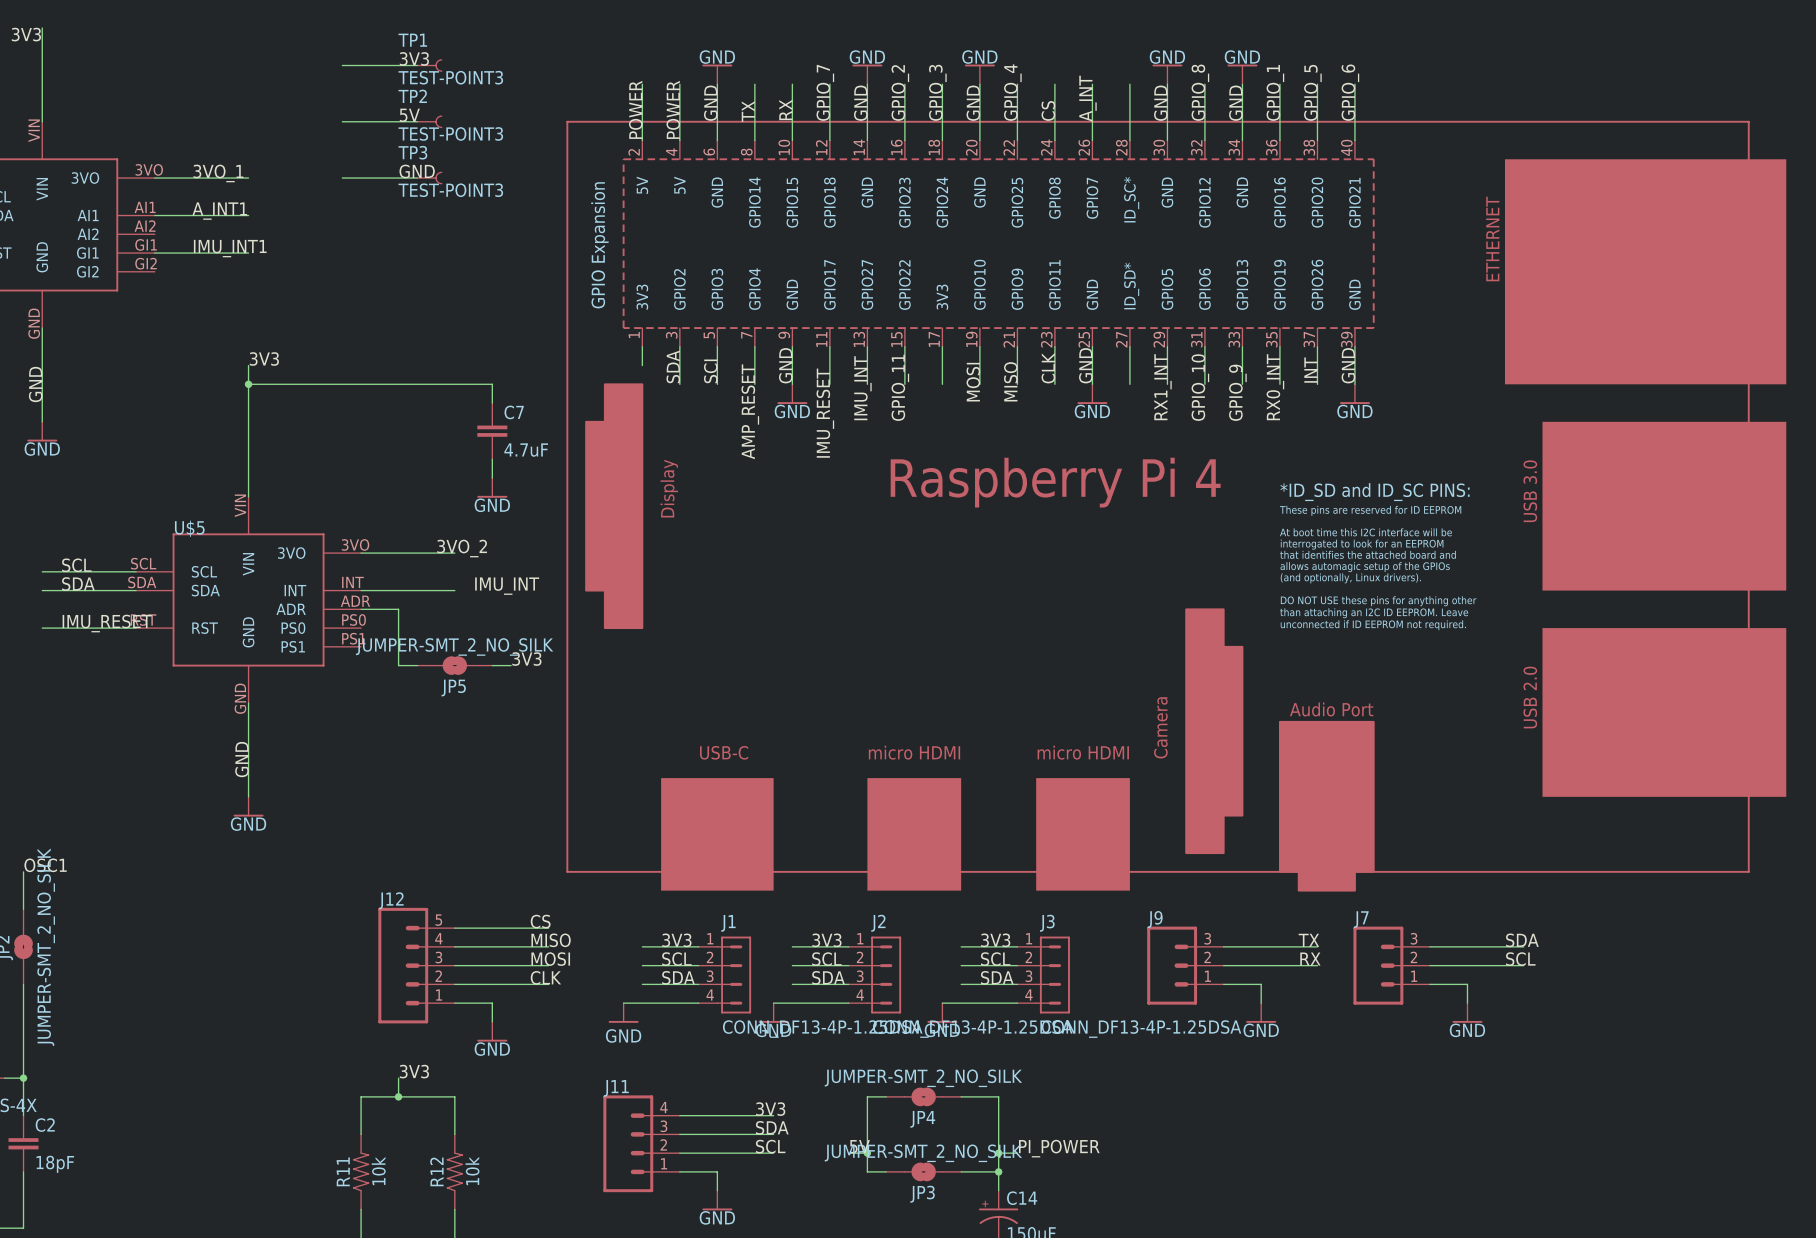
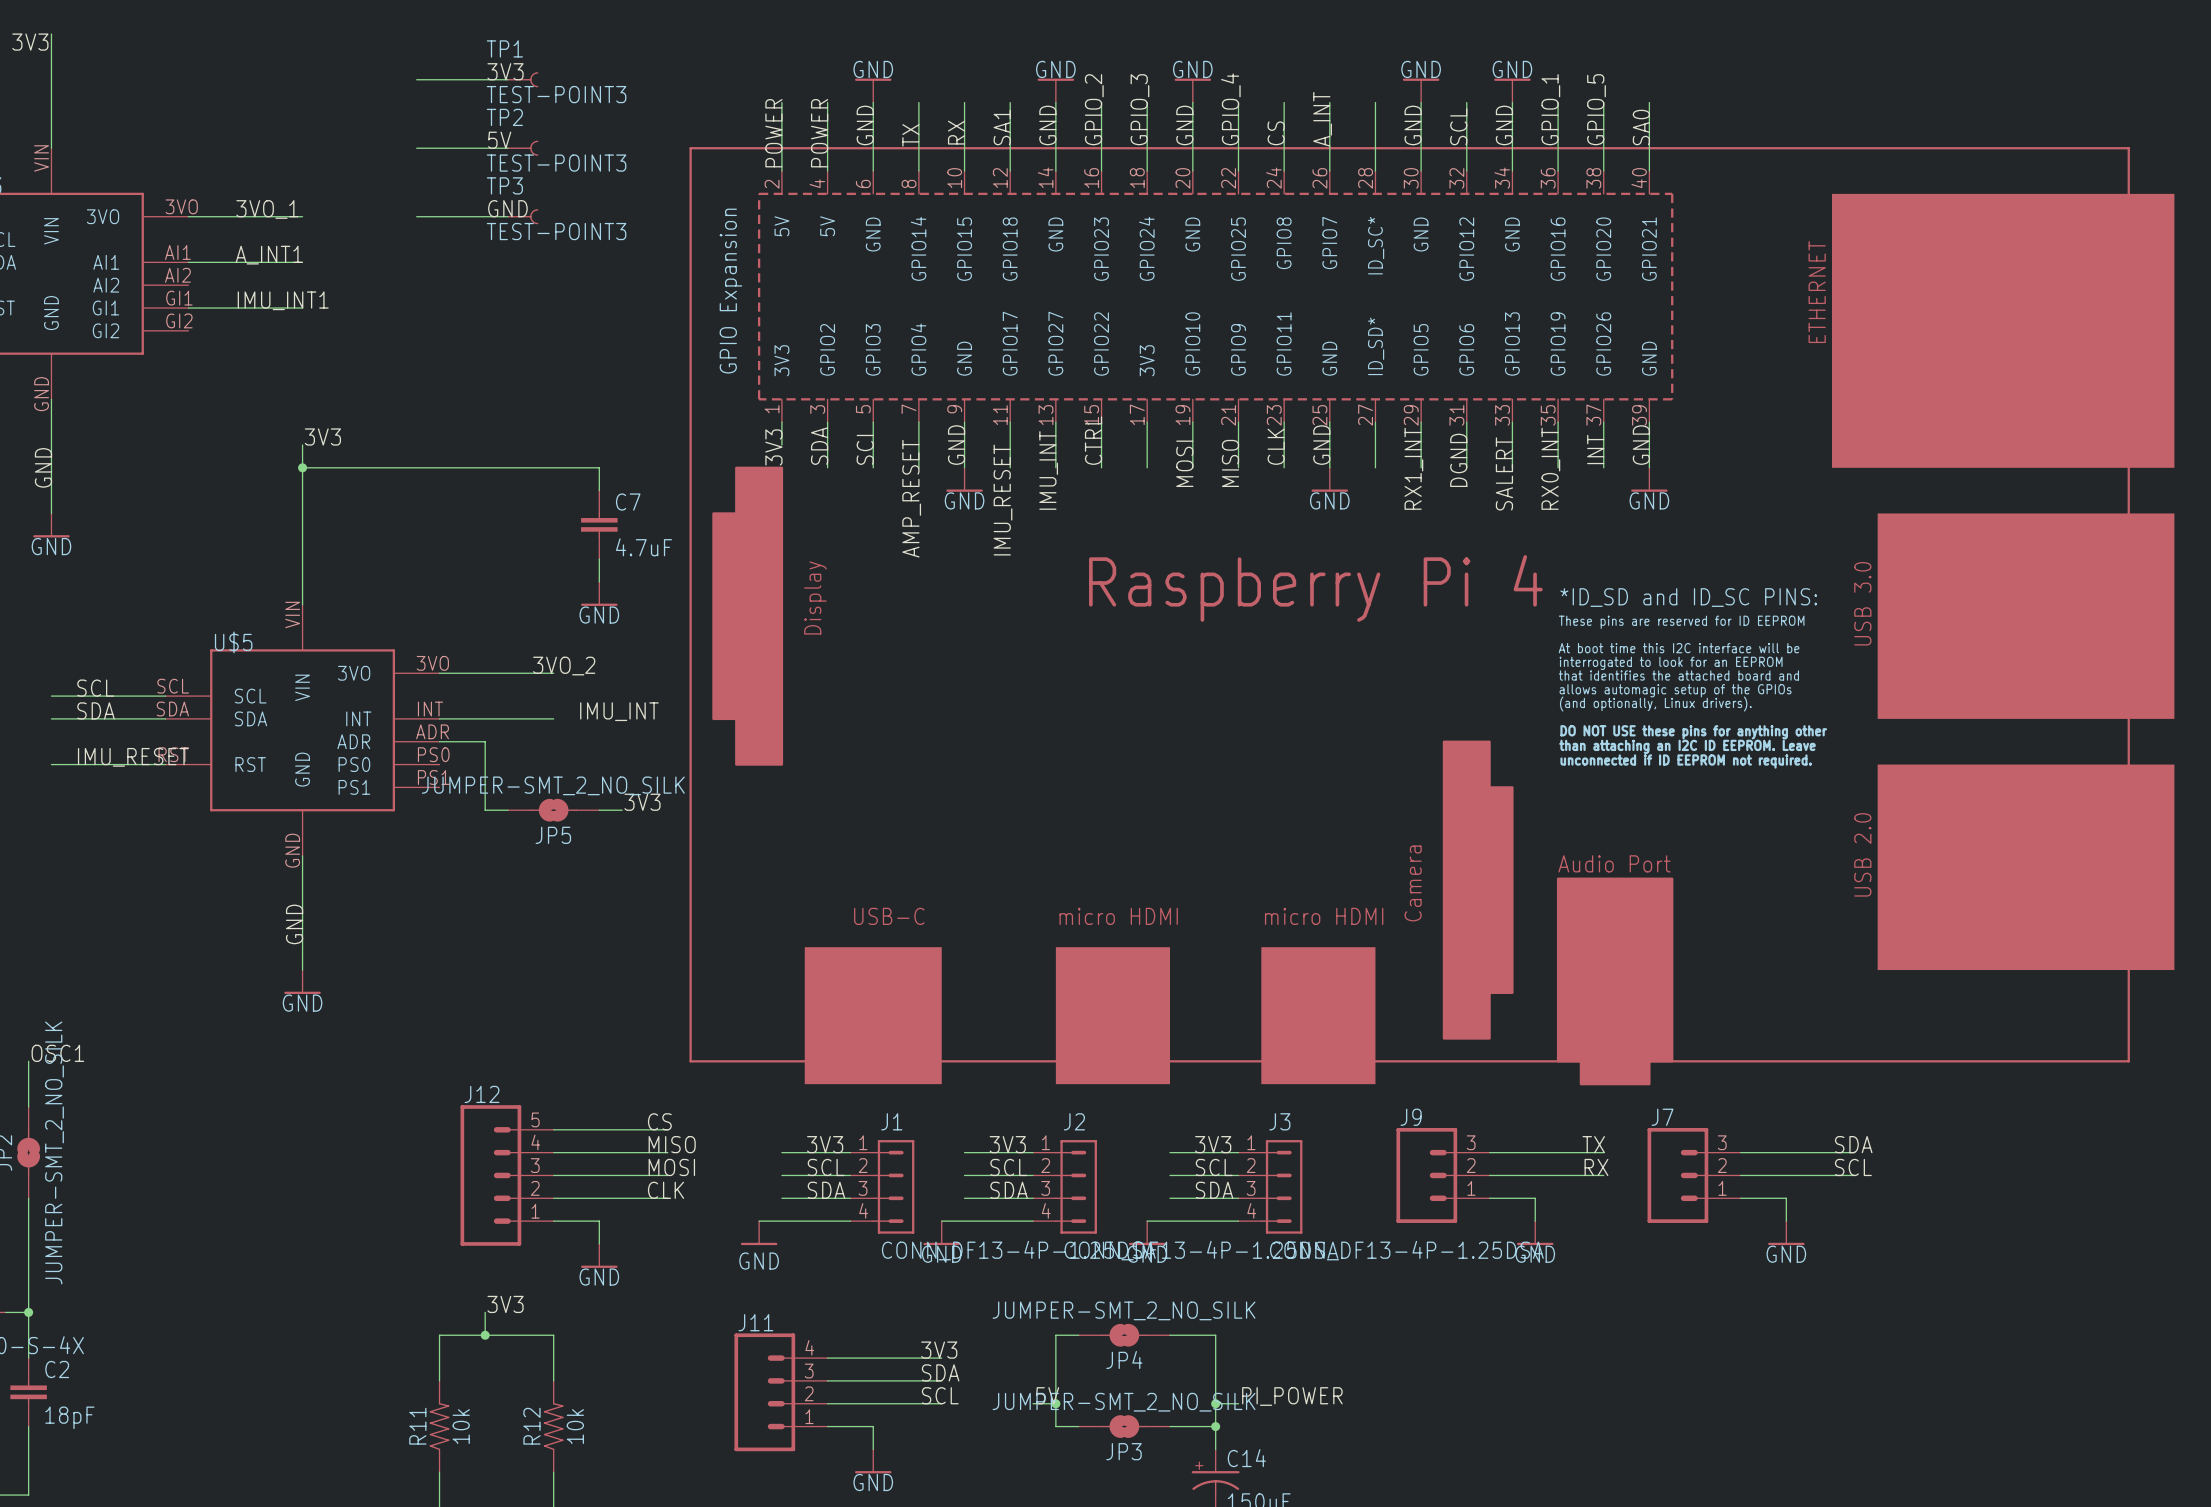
label: GPIO_7 (825, 92) -> SA1 (1002, 127)
label: GPIO_8 (1200, 92) -> SCL (1458, 126)
label: GPIO_6 (1350, 92) -> SA0 (1641, 127)
label: none -> CTRL (1093, 440)
label: none -> 3V3 (773, 447)
label: none -> DGND (1458, 460)
label: GPIO_11 (900, 387) -> none
label: GPIO_10 (1200, 387) -> none
label: GPIO_9 (1237, 392) -> SALERT (1504, 473)

